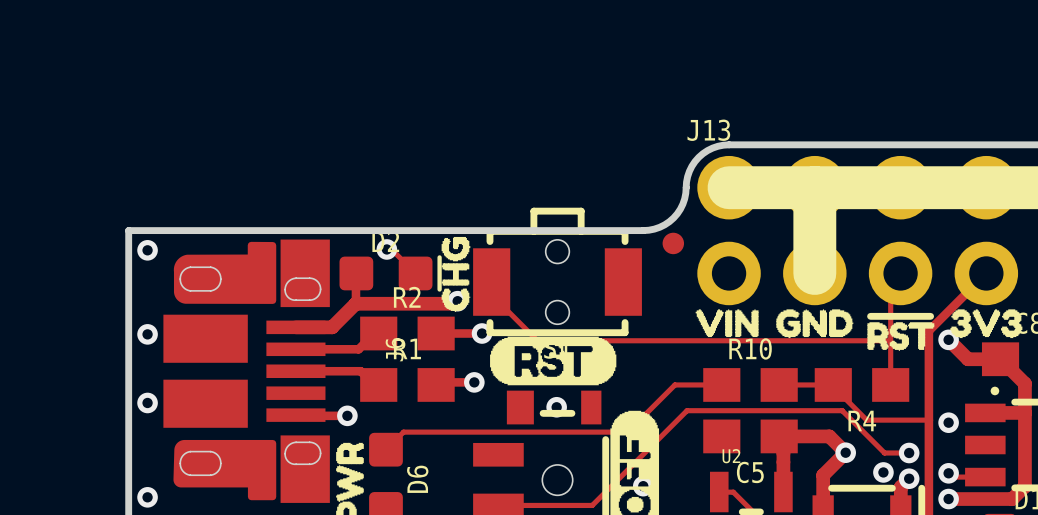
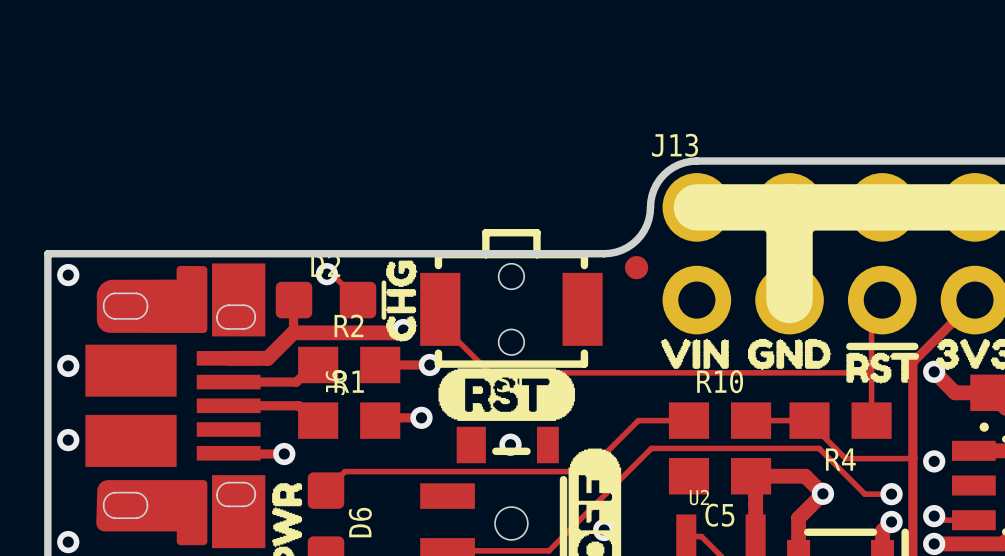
via: (883, 472) -> none

